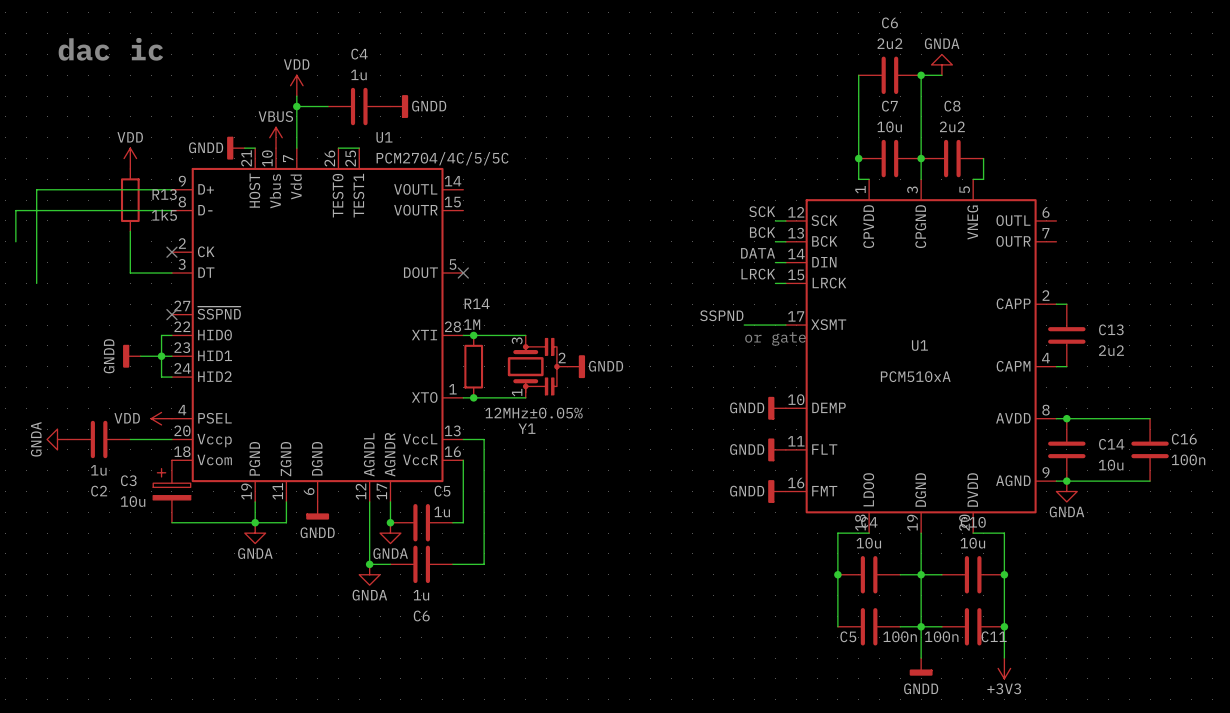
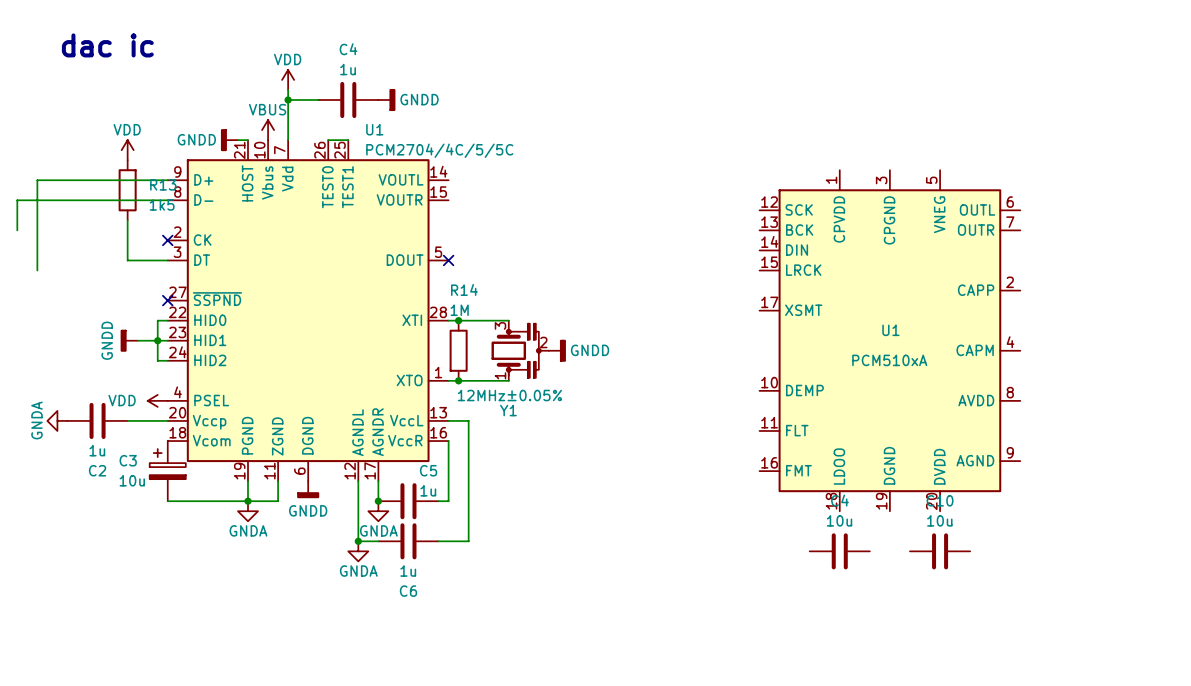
power symbol: GNDA (941, 64) -> none
wire: (858, 75) (858, 179) (869, 179) -> none
C6: 2u2 (889, 75) -> none
junction: (921, 75) -> none
wire: (941, 75) (921, 75) (921, 179) -> none
junction: (858, 158) -> none
C7: 10u (889, 158) -> none
junction: (921, 158) -> none
C8: 2u2 (952, 158) -> none
wire: (983, 158) (983, 179) (973, 179) -> none
label: SCK (762, 211) -> none
wire: (775, 220) (785, 220) -> none
label: BCK (762, 232) -> none
wire: (775, 241) (785, 241) -> none
label: DATA (758, 253) -> none
wire: (775, 262) (785, 262) -> none
label: LRCK (758, 274) -> none
wire: (775, 283) (785, 283) -> none
wire: (1056, 304) (1066, 304) -> none
label: SSPND (721, 315) -> none
wire: (744, 325) (785, 325) -> none
C13: 2u2 (1066, 335) -> none
text: or gate (775, 338) -> none
wire: (1056, 366) (1066, 366) -> none
power symbol: GNDD (777, 408) -> none
wire: (1056, 418) (1150, 418) -> none
junction: (1066, 418) -> none
power symbol: GNDD (777, 449) -> none
C14: 10u (1066, 449) -> none
C16: 100n (1150, 449) -> none
wire: (1056, 481) (1150, 481) -> none
junction: (1066, 481) -> none
power symbol: GNDD (777, 491) -> none
power symbol: GNDA (1066, 491) -> none
wire: (869, 533) (837, 533) (837, 626) -> none
wire: (921, 533) (921, 658) -> none
wire: (973, 533) (1004, 533) (1004, 658) -> none
junction: (837, 574) -> none
wire: (900, 574) (941, 574) -> none
junction: (921, 574) -> none
junction: (1004, 574) -> none
C5: 100n (869, 626) -> none
wire: (900, 626) (941, 626) -> none
junction: (921, 626) -> none
C11: 100n (973, 626) -> none
junction: (1004, 626) -> none
power symbol: GNDD (921, 666) -> none
power symbol: +3V3 (1004, 668) -> none

